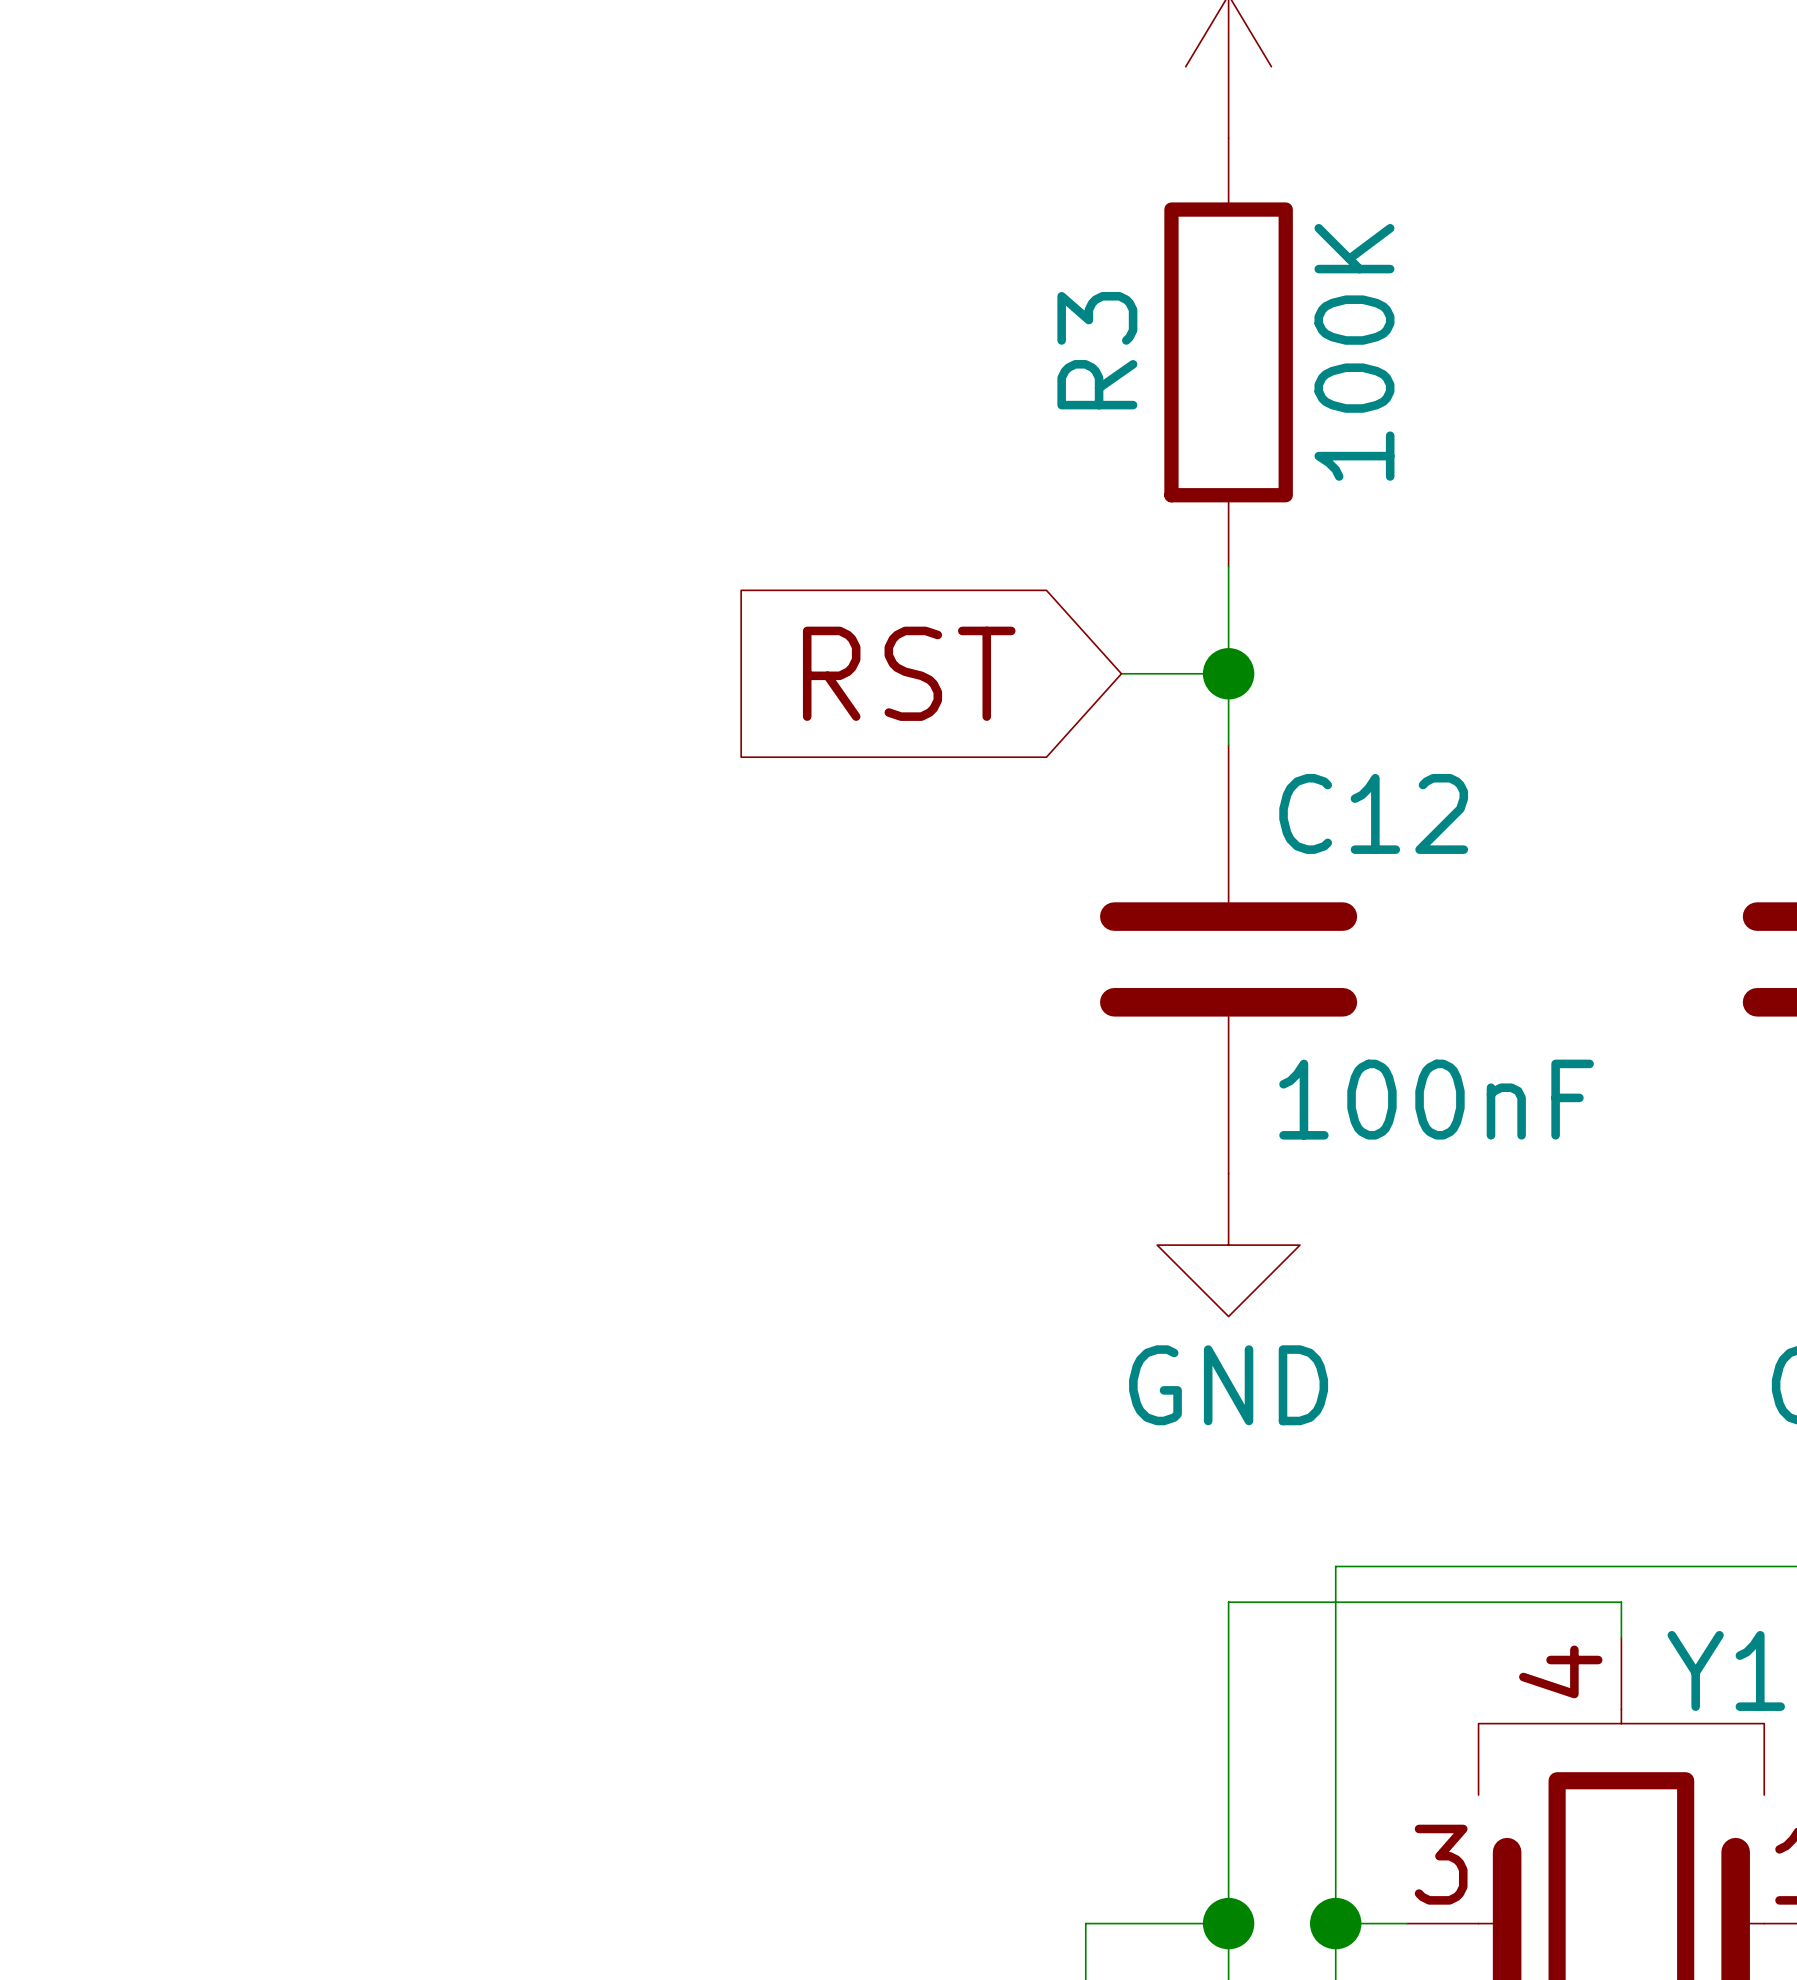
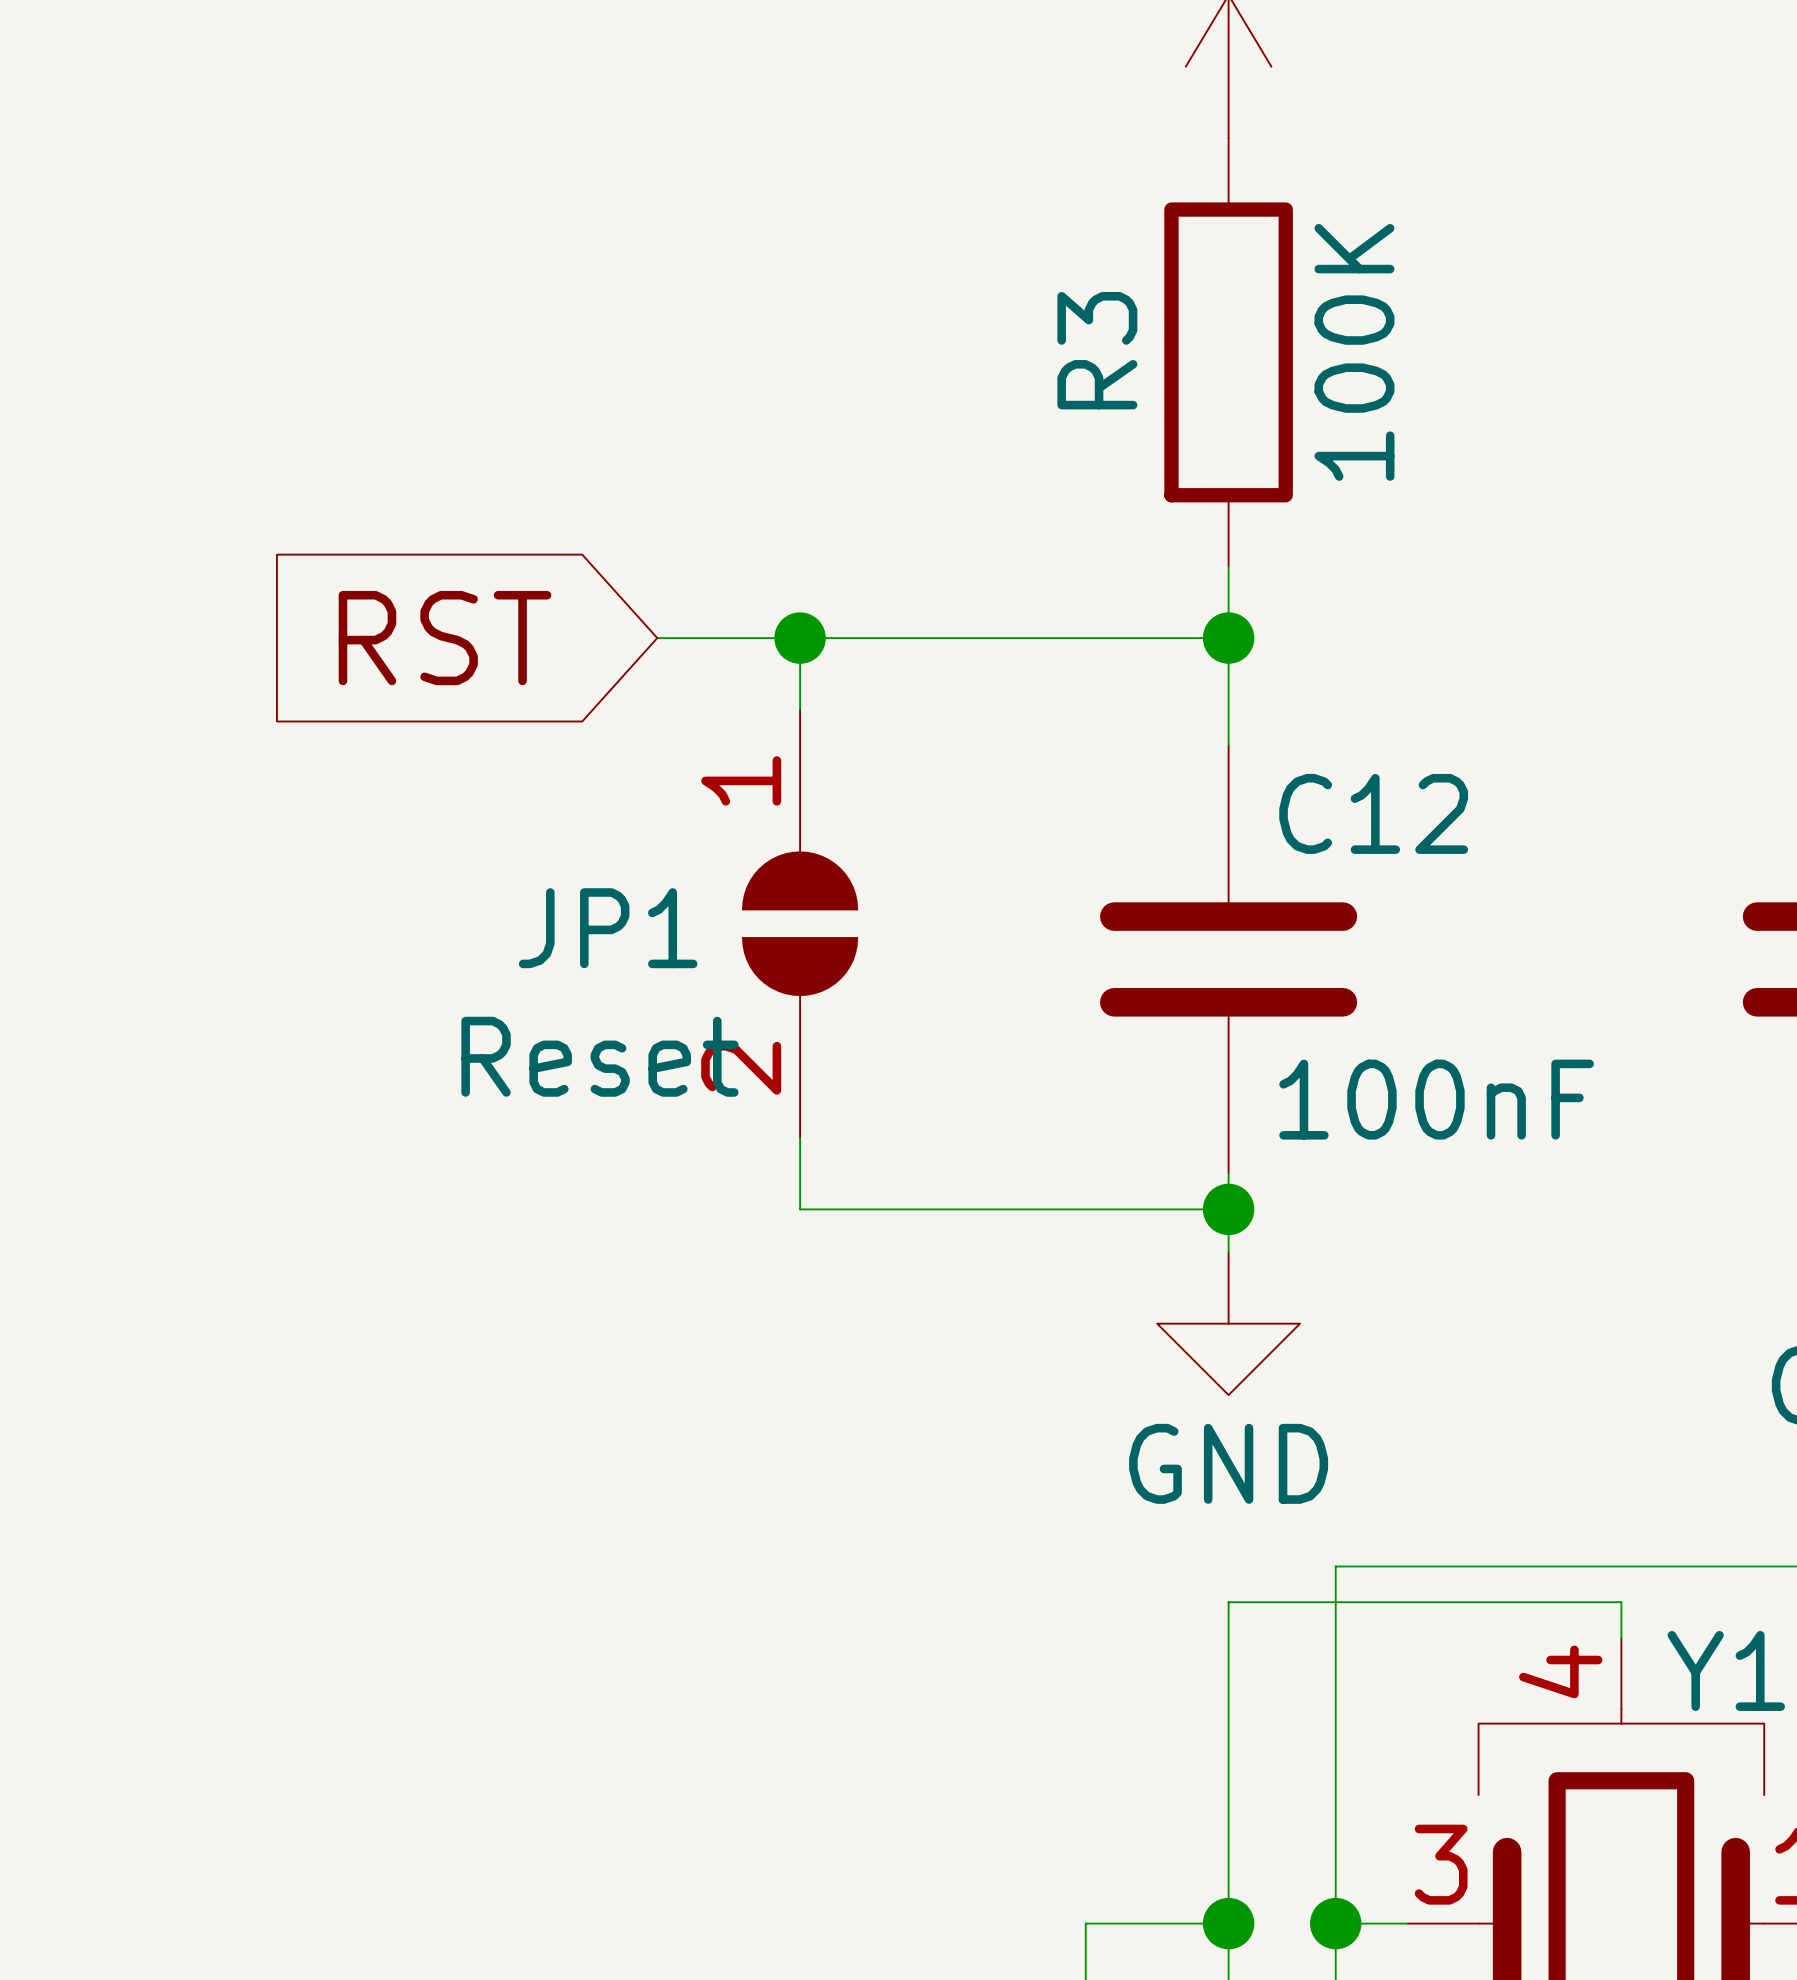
wire: none -> (657, 638) (1228, 638)
wire: none -> (800, 638) (800, 709)
junction: none -> (800, 638)
global label position: RST (909, 673) -> RST (445, 638)
wire: (1121, 673) (1228, 673) -> none
junction position: (1228, 673) -> (1228, 638)
JP1: none -> Reset (800, 923)
wire: none -> (800, 1137) (800, 1209) (1228, 1209)
junction: none -> (1228, 1209)
power symbol position: GND (1228, 1245) -> GND (1228, 1323)

